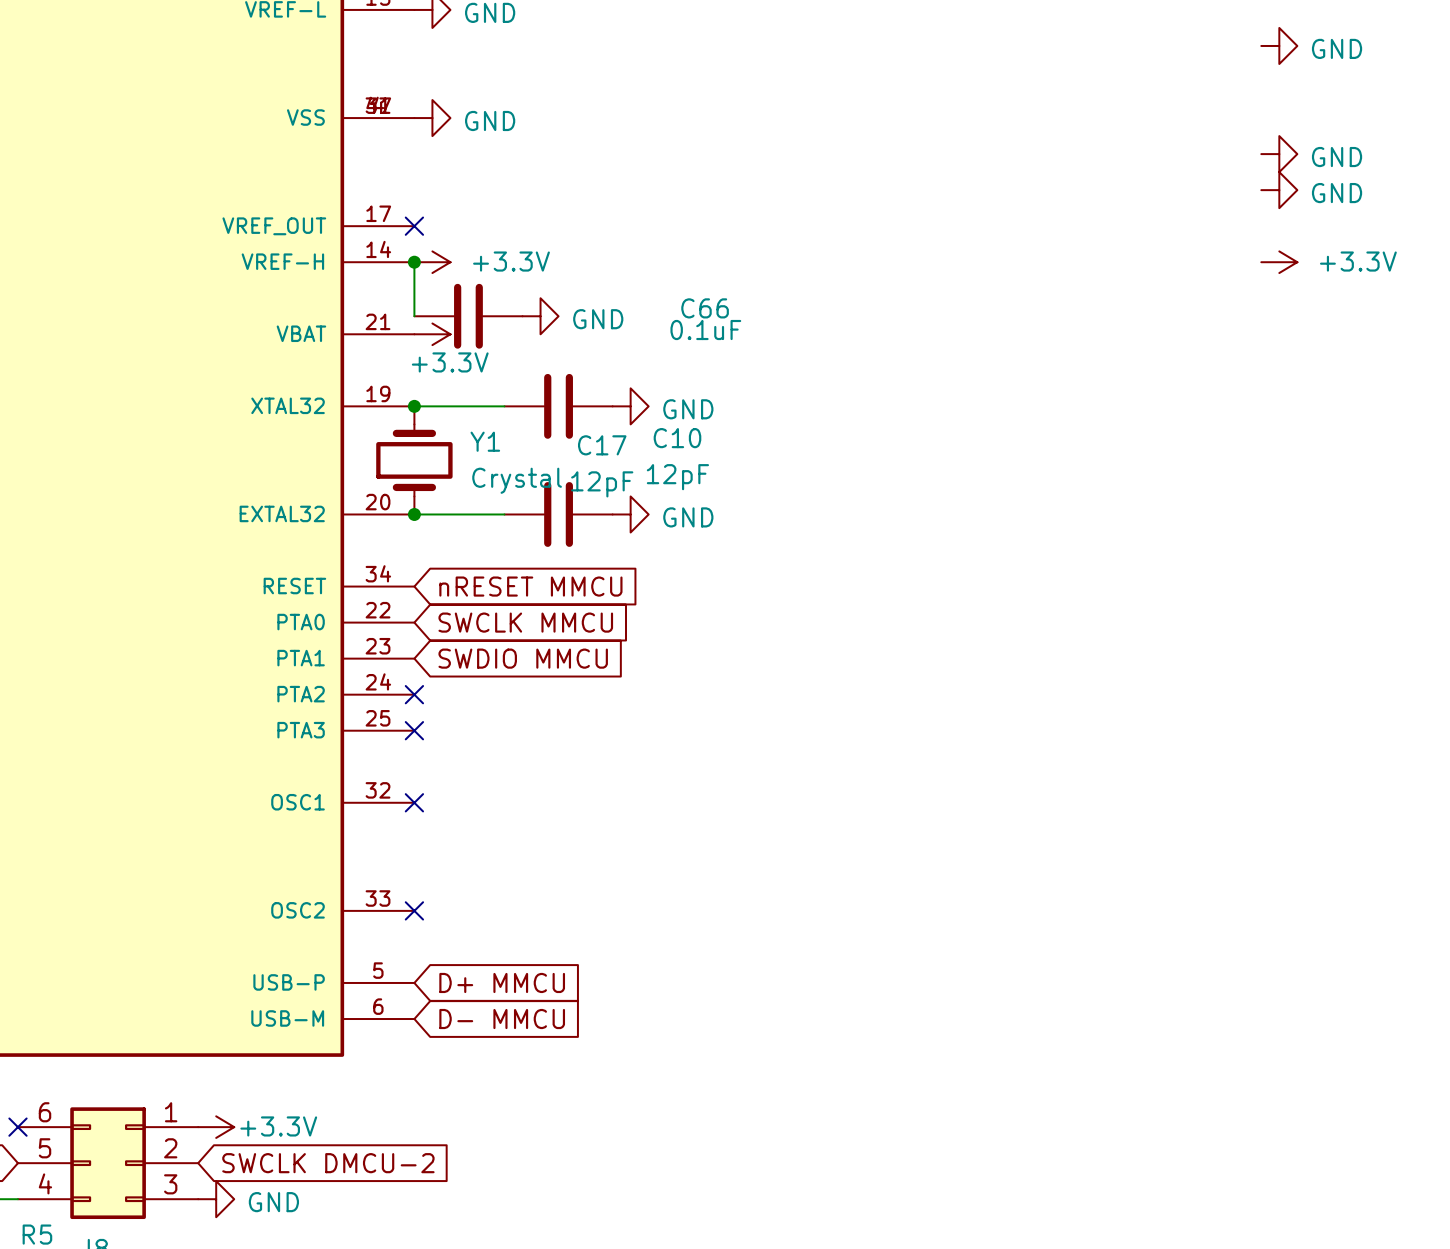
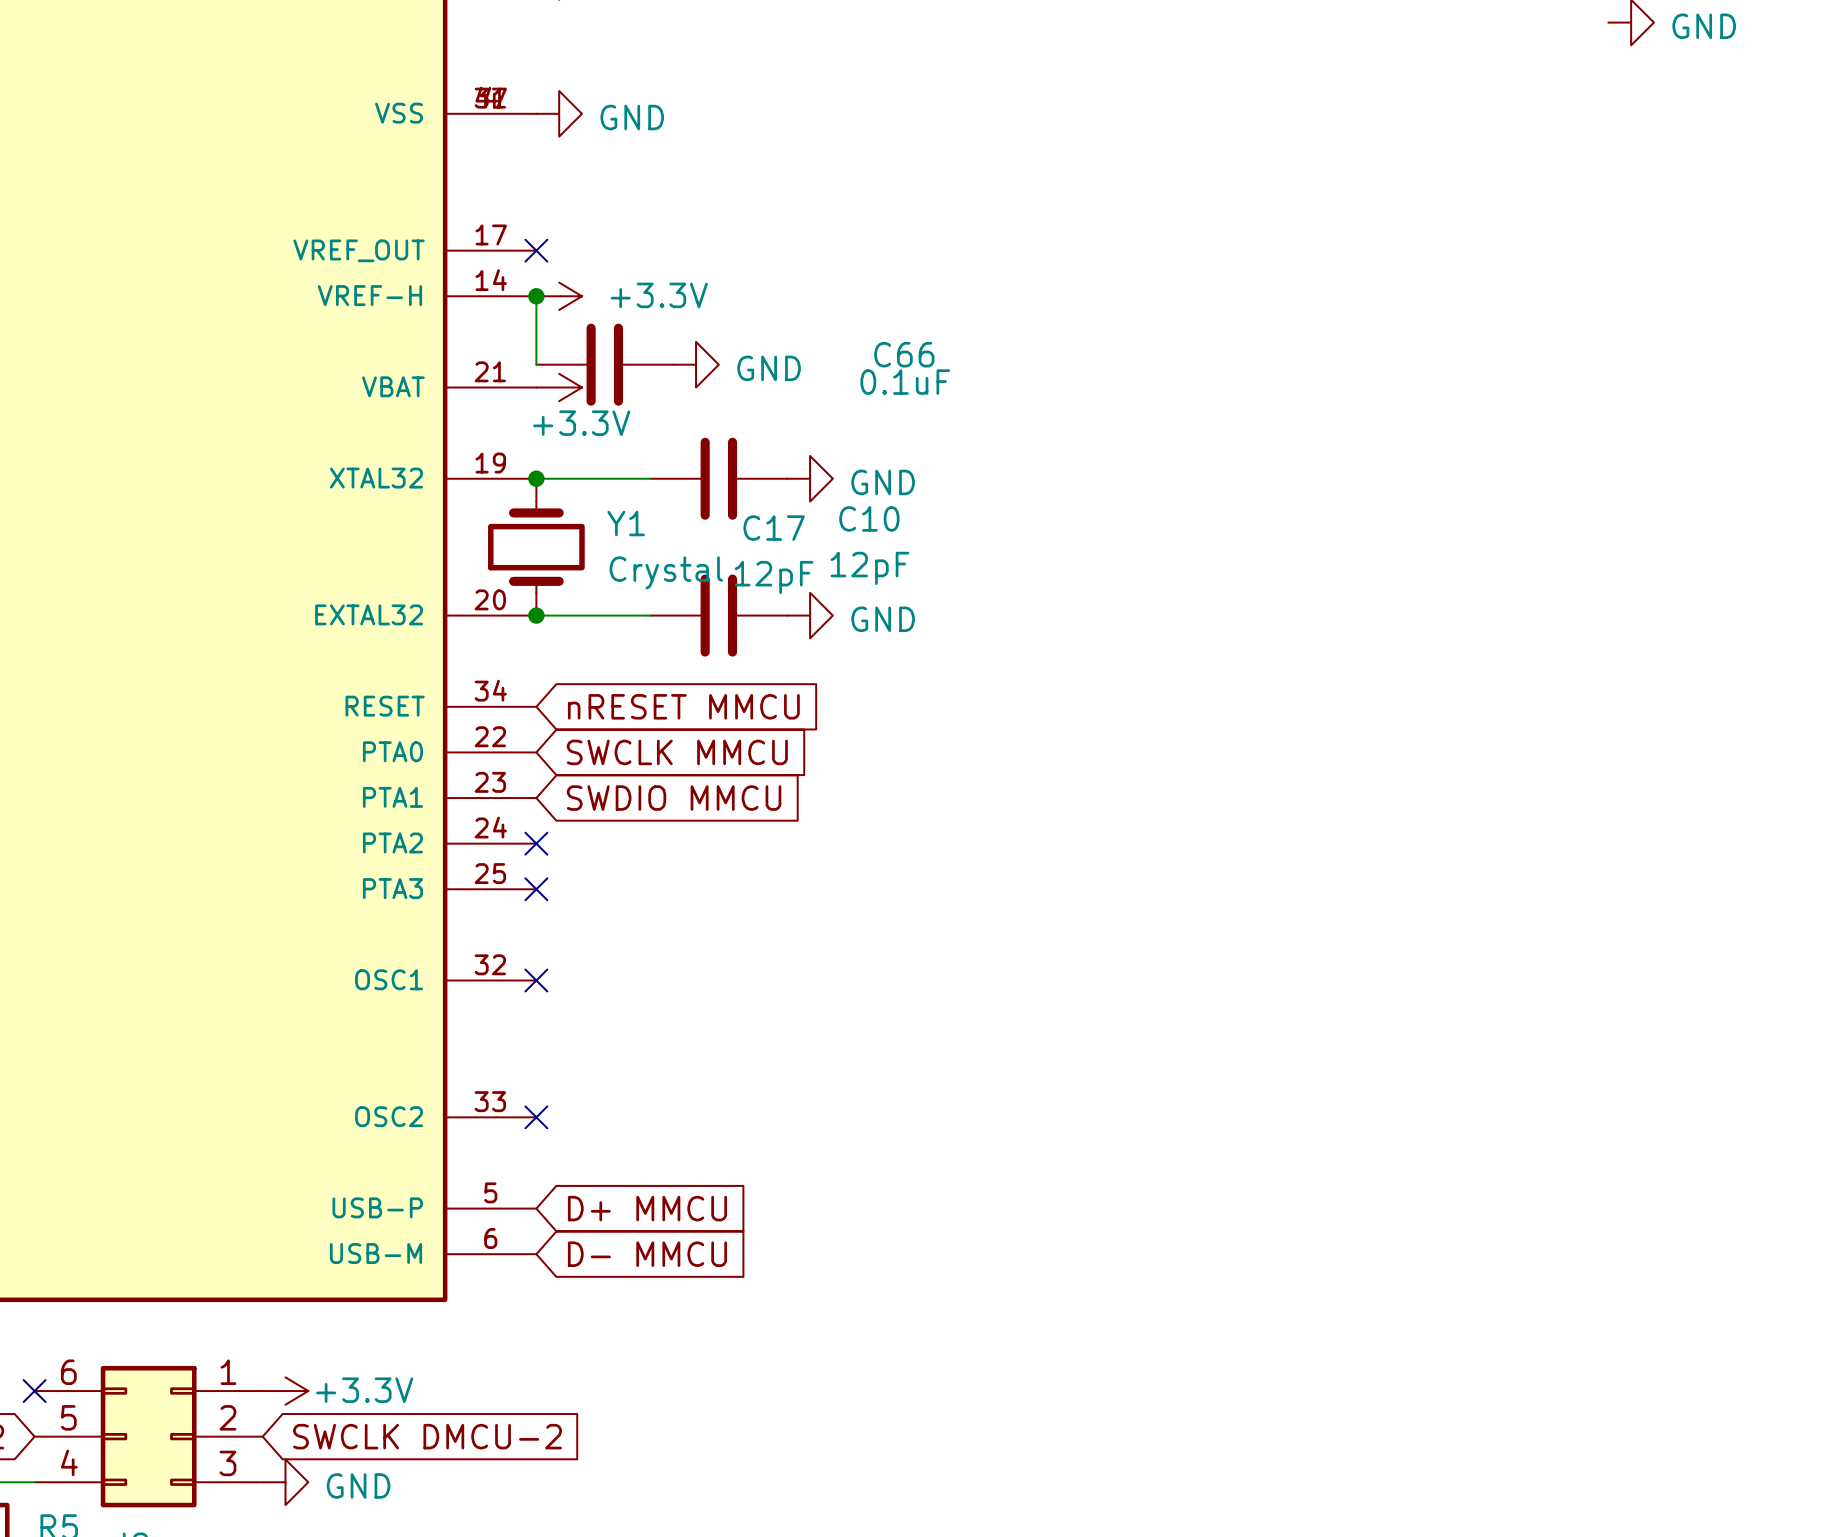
power symbol: GND (1279, 154) -> none
power symbol: GND (1279, 190) -> none
power symbol: +3.3V (1279, 262) -> none

